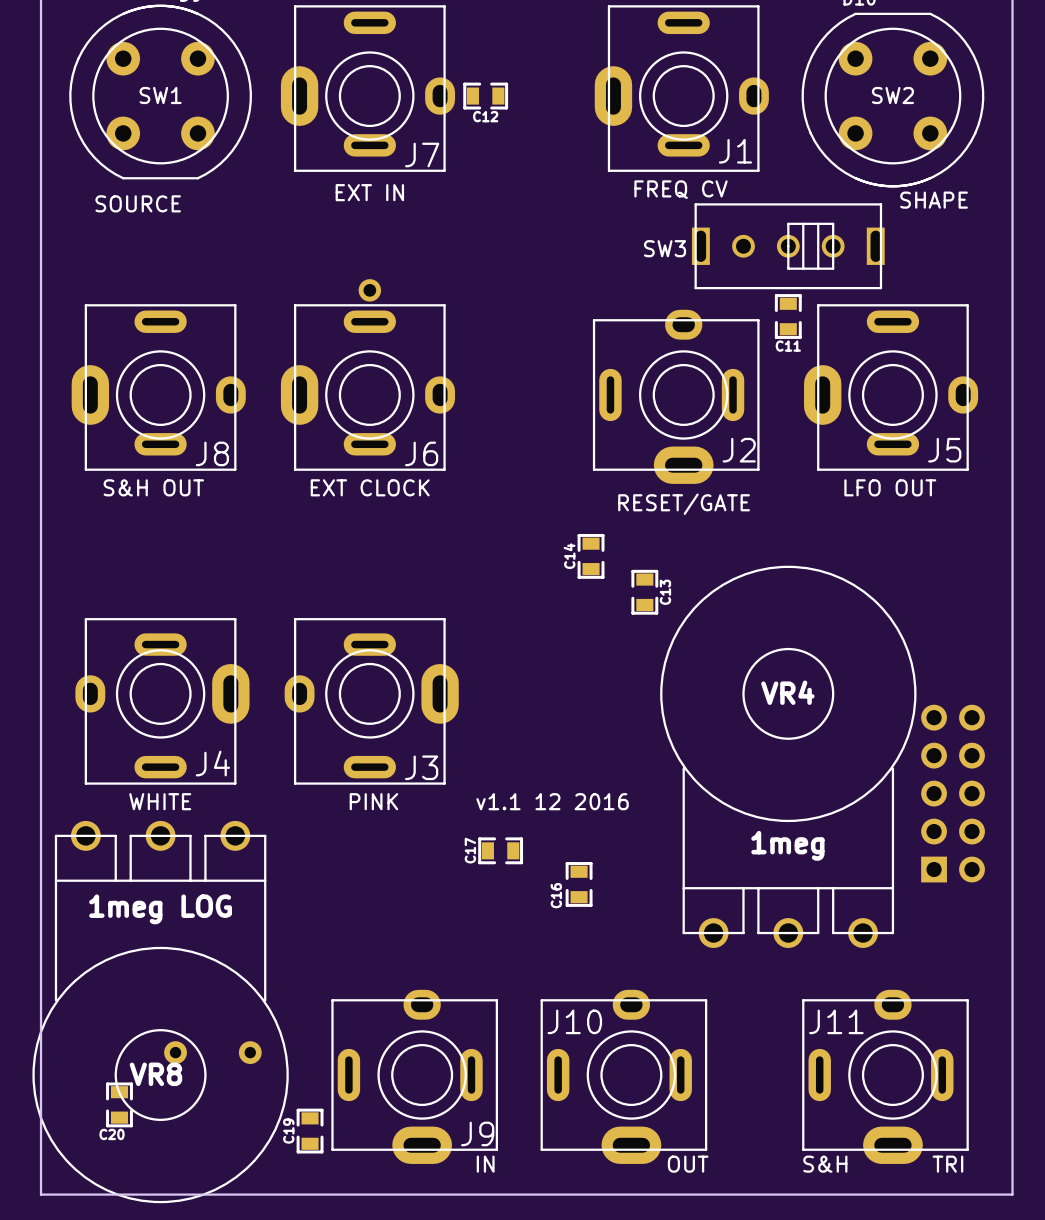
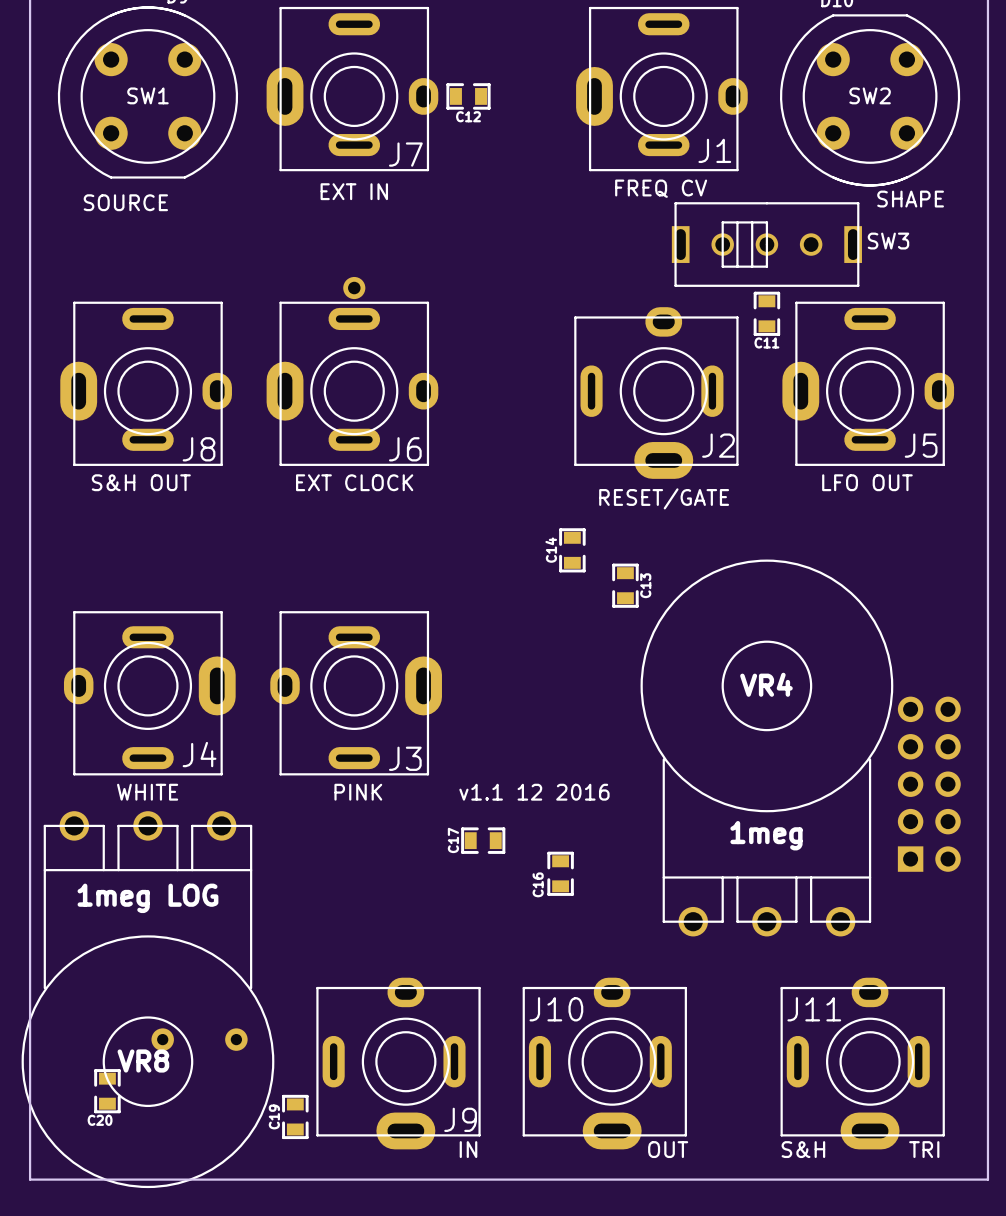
SW3 rotation: 0° (788, 246) -> 180° (766, 244)

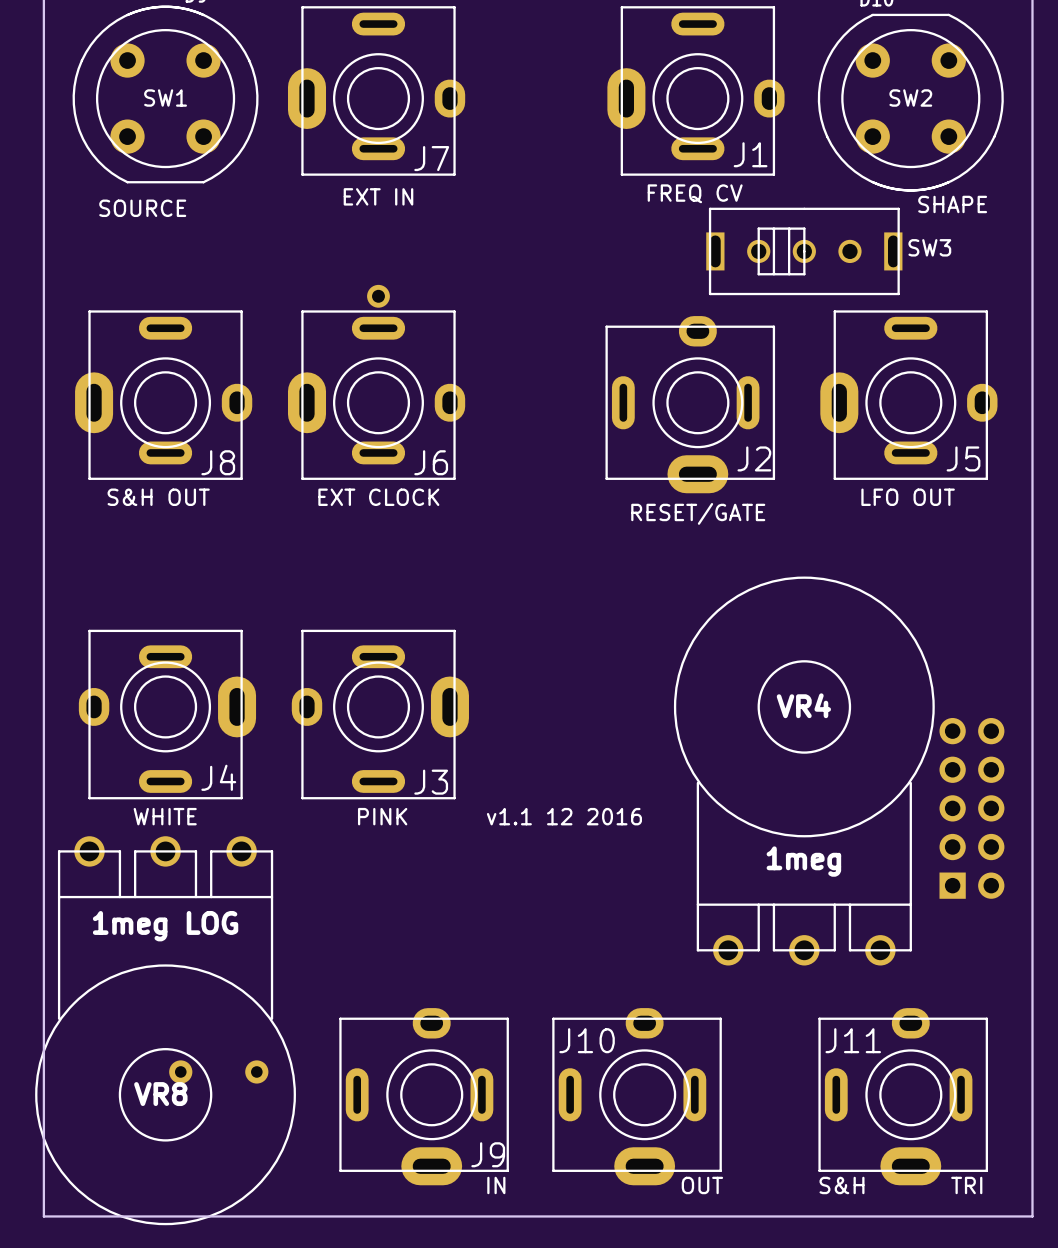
C12: (468, 96) -> none
C11: (766, 313) -> none
C14: (572, 550) -> none
C13: (625, 585) -> none
C17: (483, 840) -> none
C16: (560, 873) -> none
C20: (107, 1091) -> none
C19: (295, 1116) -> none

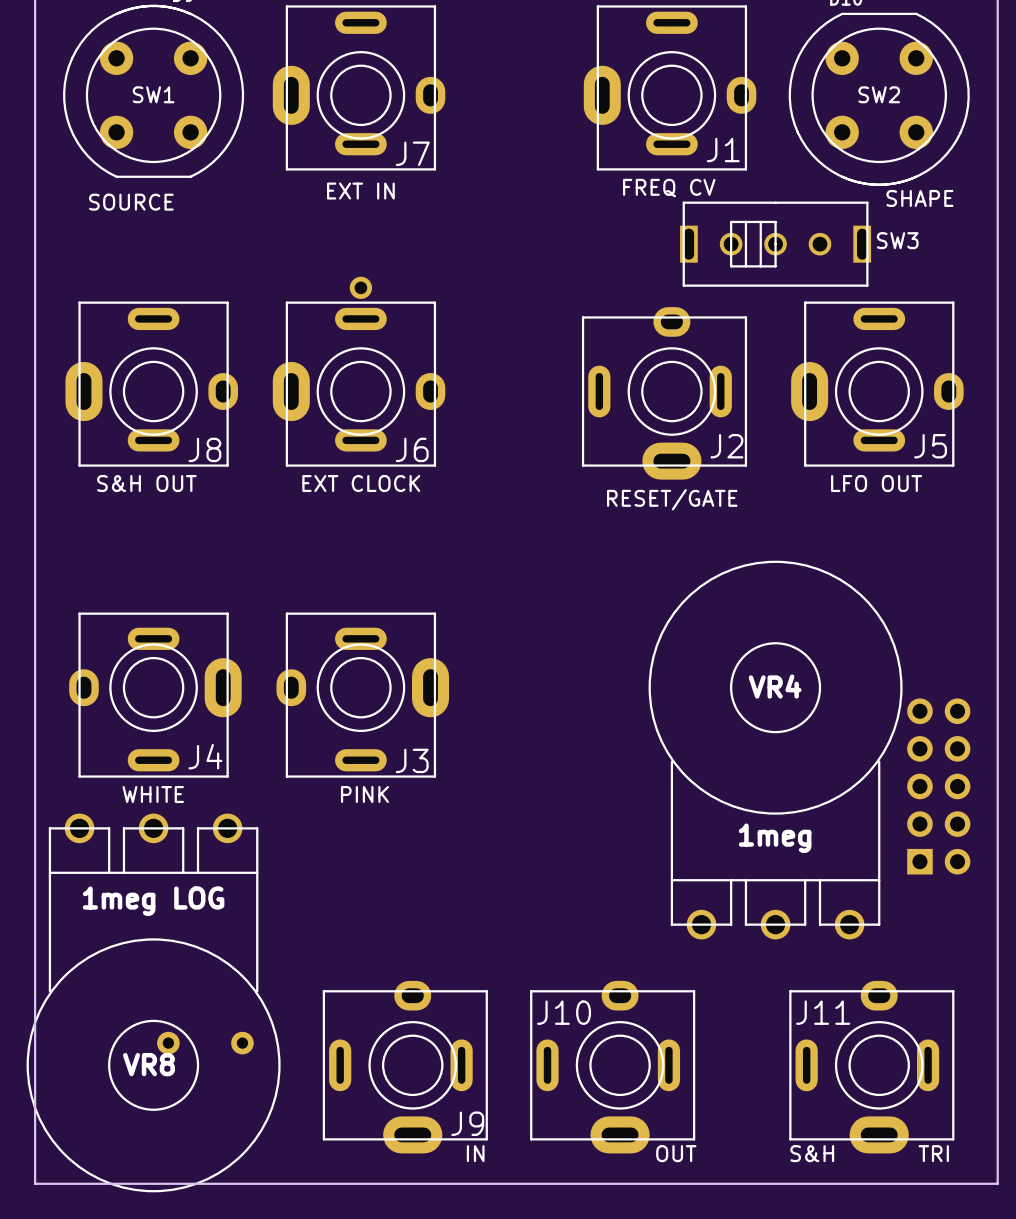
text: v1.1 12 2016 (564, 816) -> none

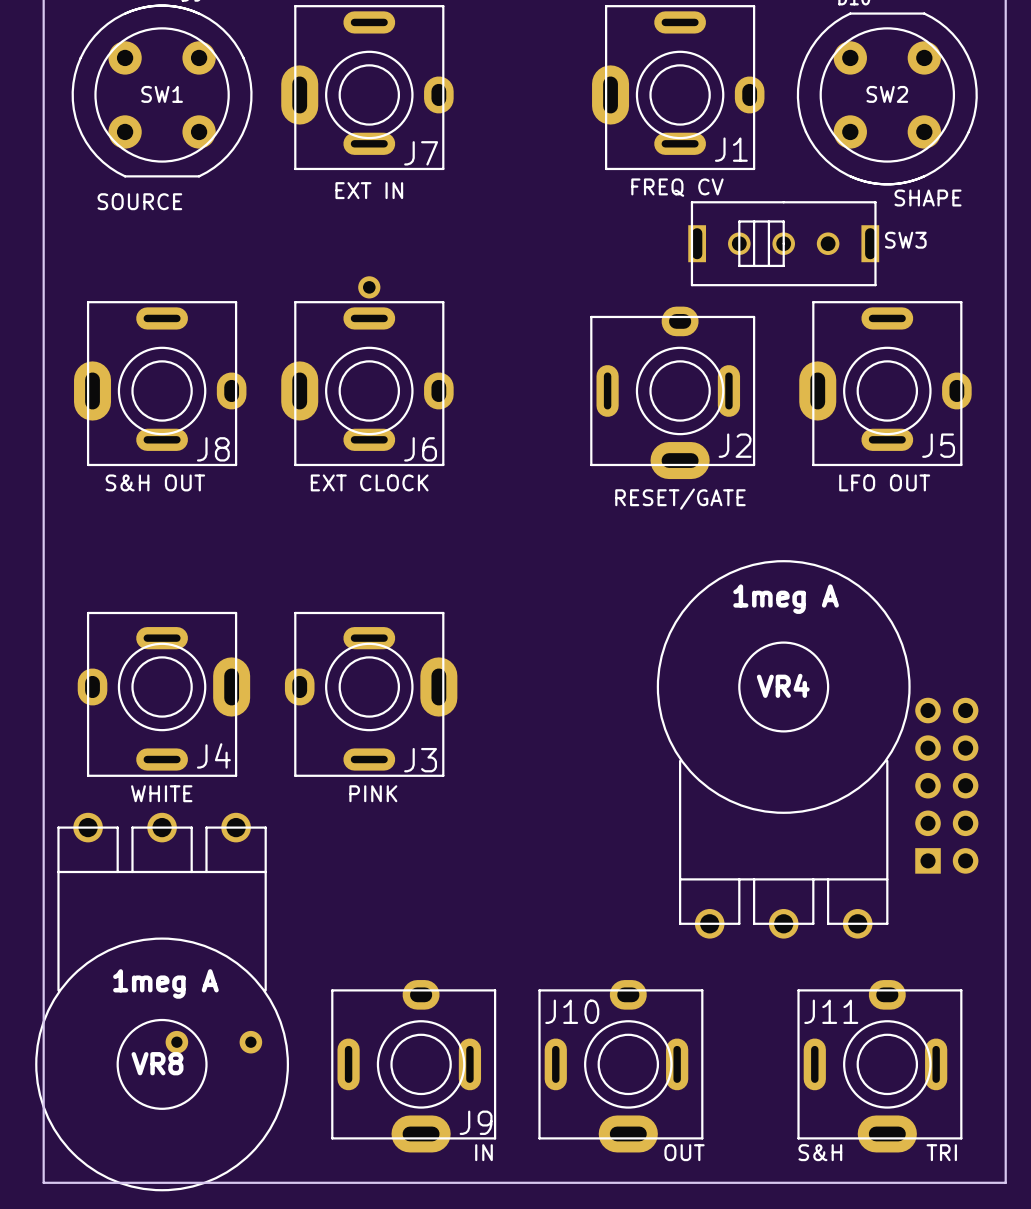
VR4 value: 1meg (775, 838) -> 1meg A (786, 599)
VR8 value: 1meg LOG (153, 901) -> 1meg A (165, 983)

